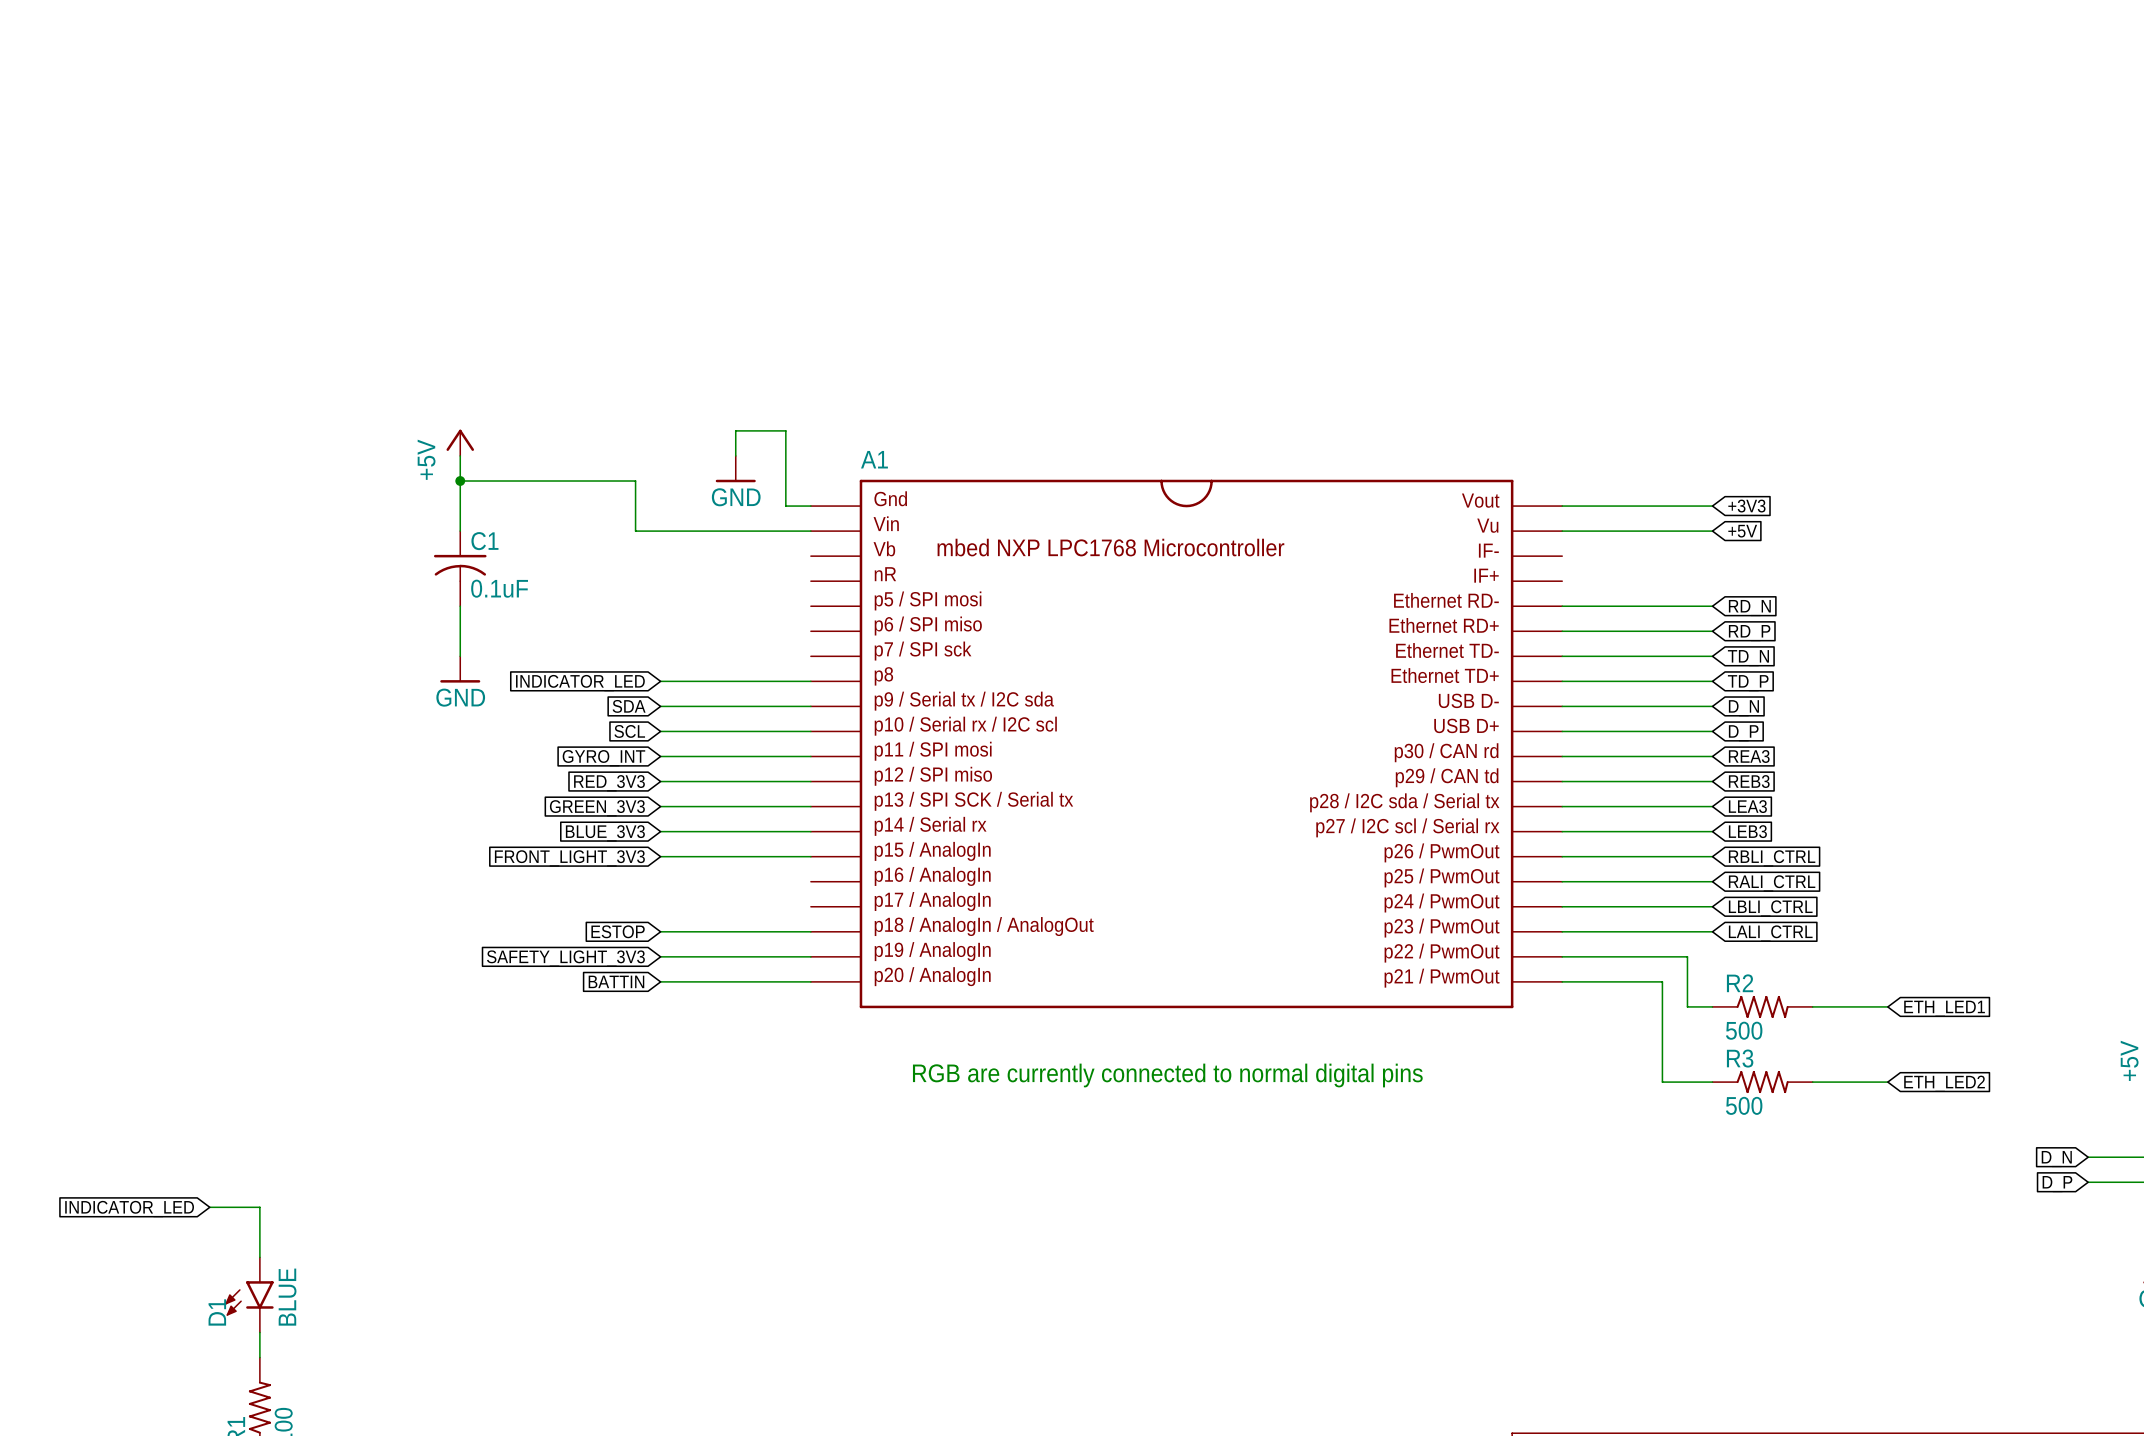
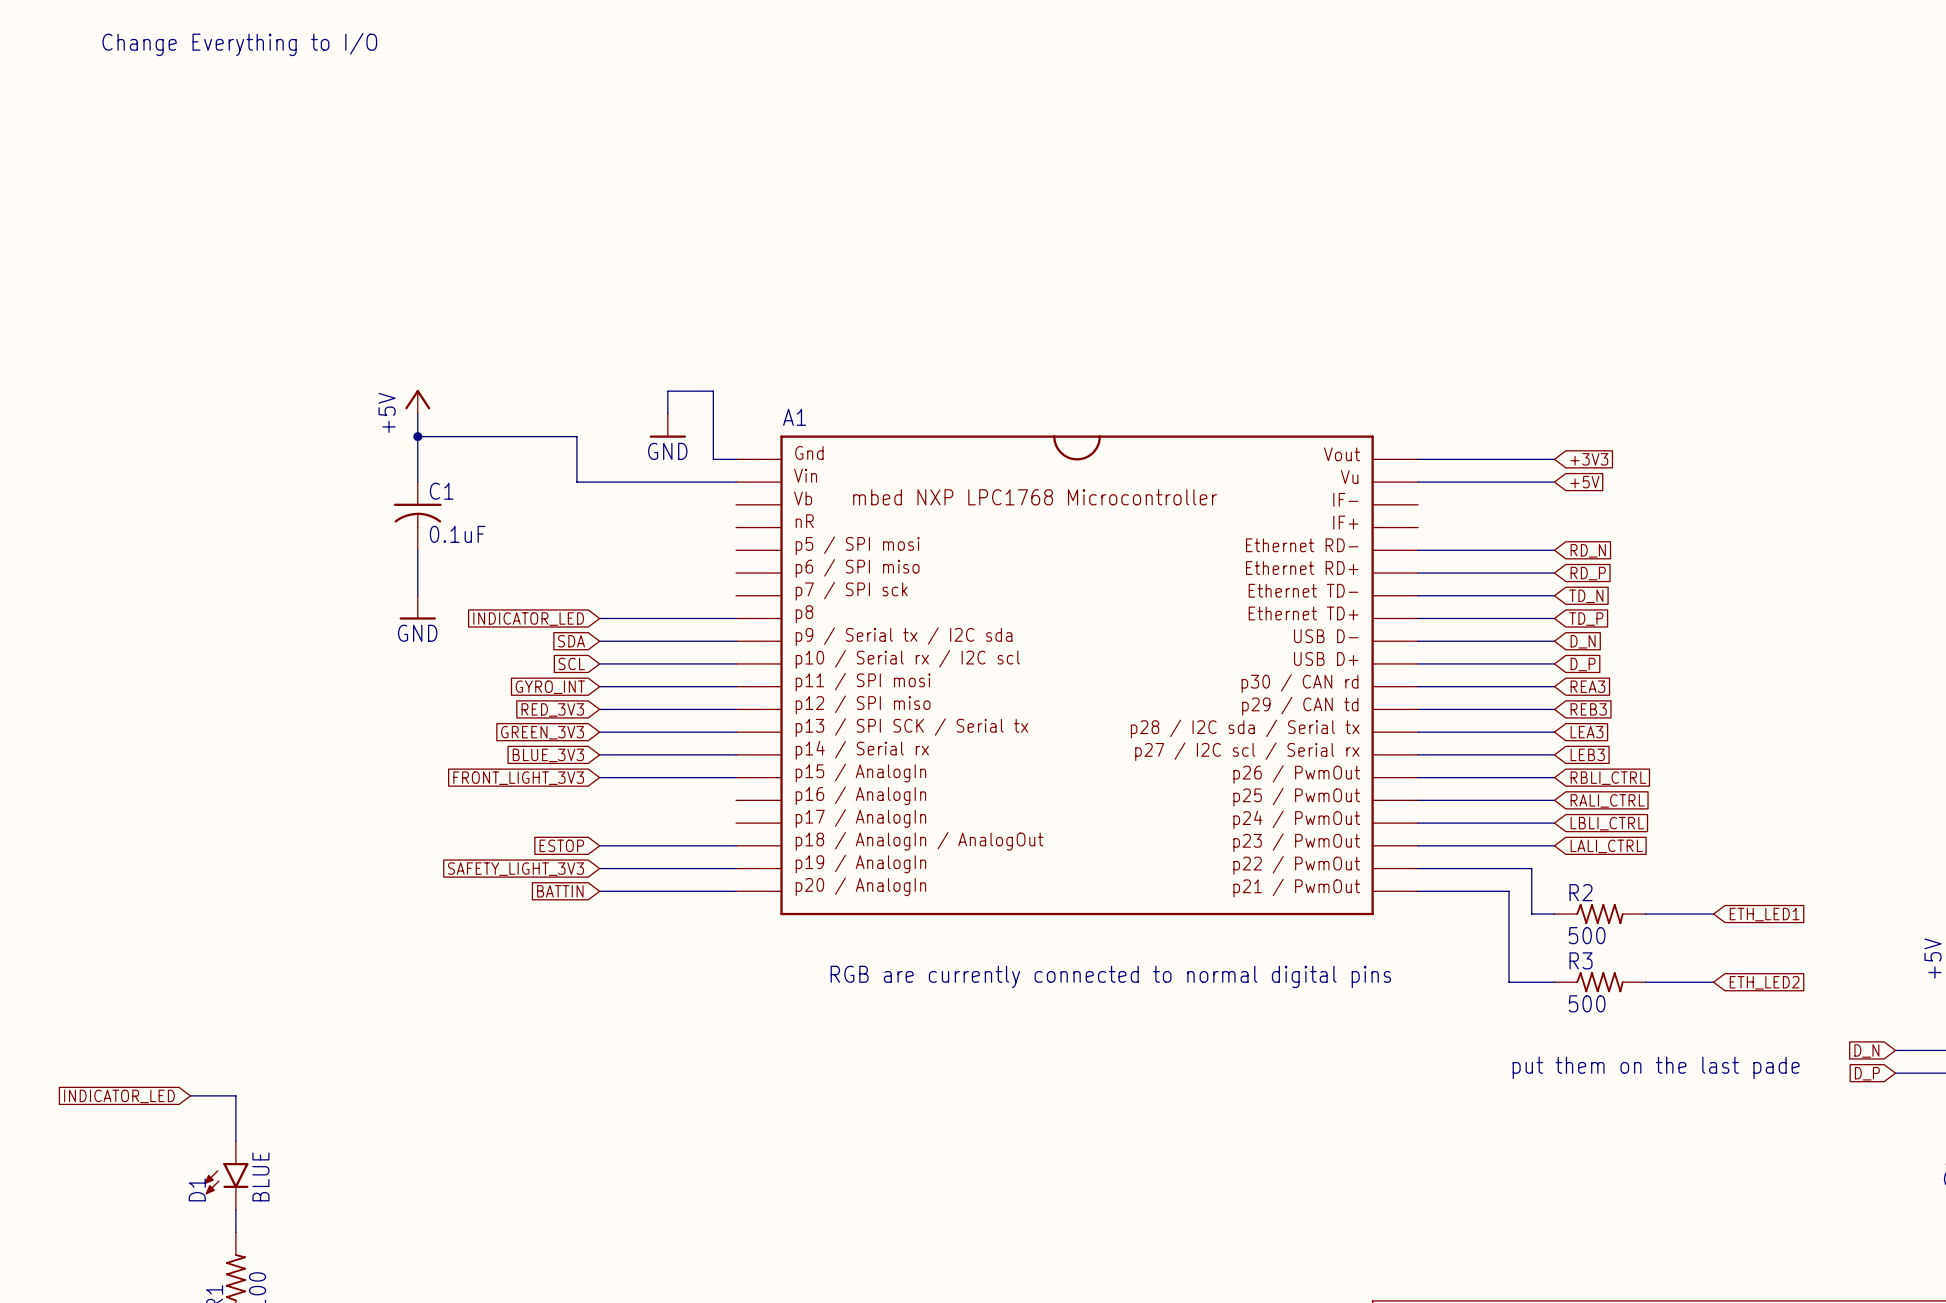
text: none -> Change Everything to I/O (239, 44)
text: none -> put them on the last pade (1656, 1067)

